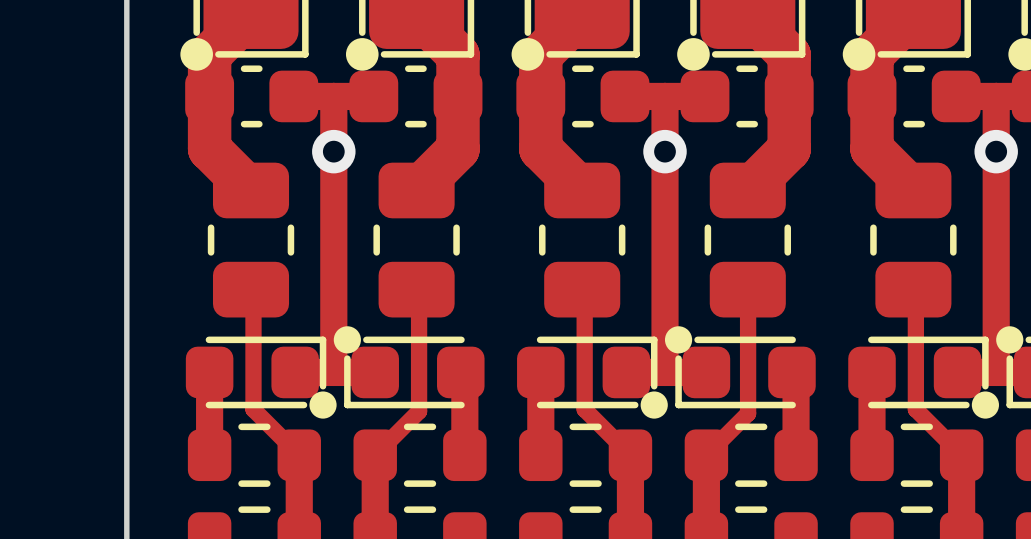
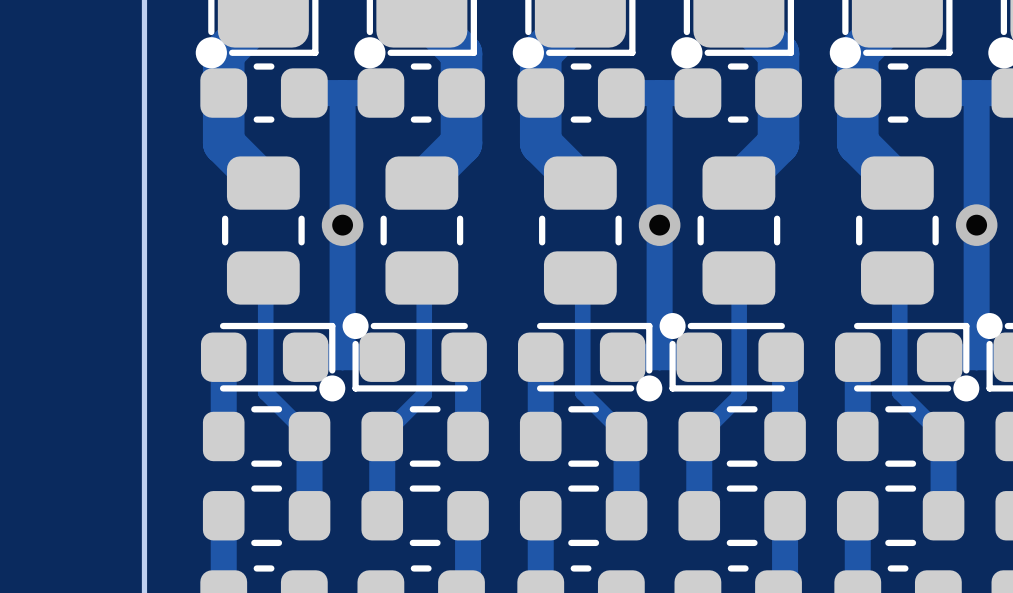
via position: (333, 151) -> (342, 225)
via position: (665, 151) -> (659, 225)
via position: (996, 151) -> (976, 225)

